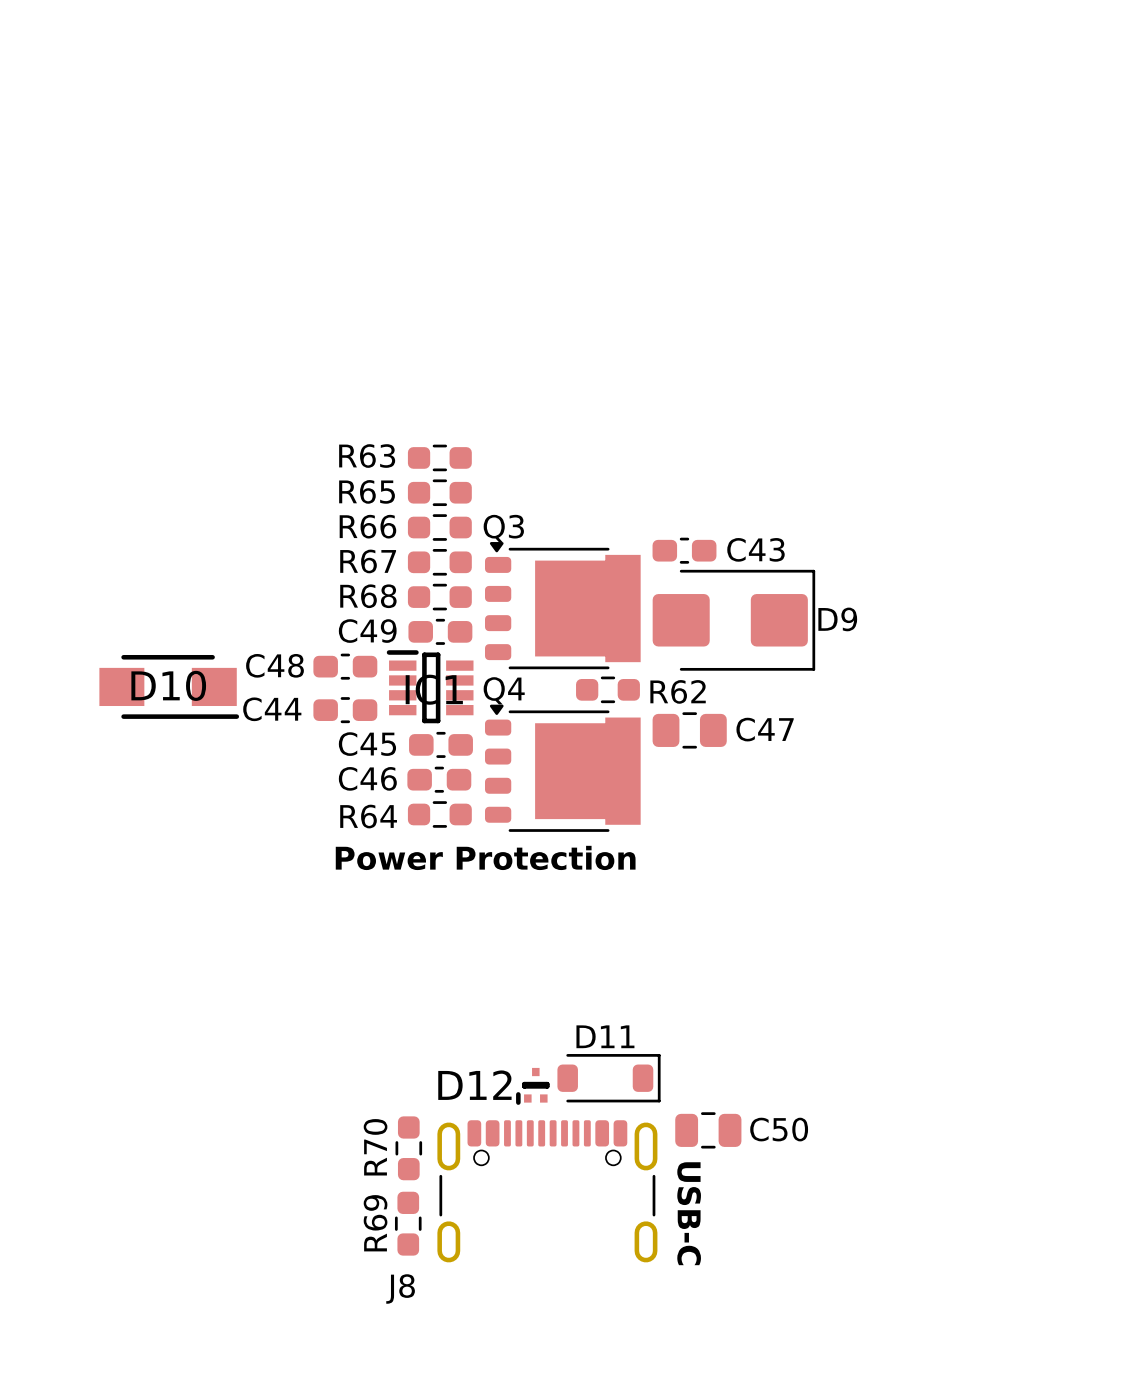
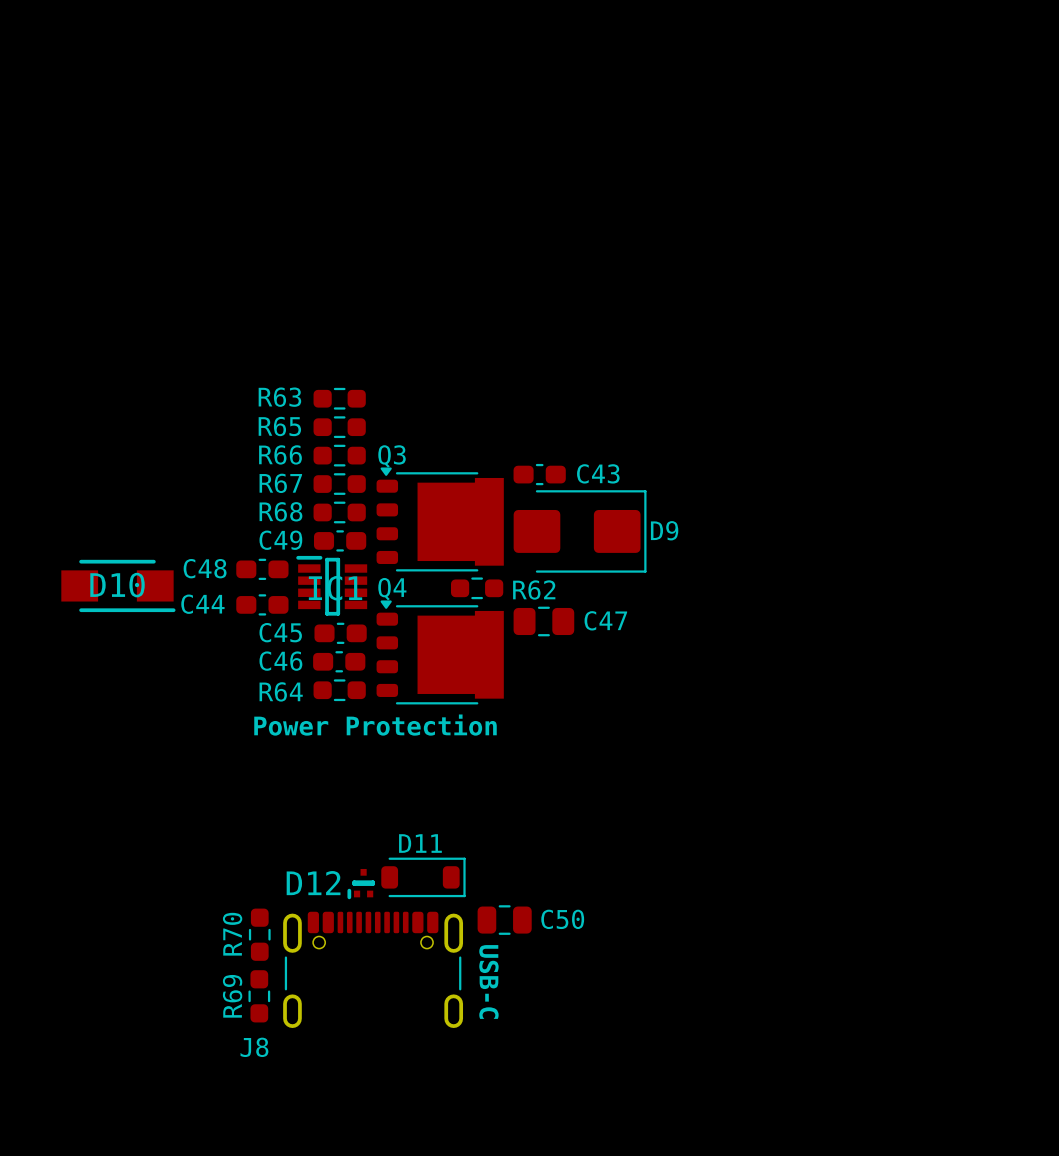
D11 position: (609, 1078) -> (423, 877)
D12 position: (532, 1086) -> (361, 884)
C50 position: (708, 1130) -> (504, 920)
R70 position: (408, 1148) -> (259, 934)
J8 position: (547, 1191) -> (373, 969)
text position: USB-C (689, 1213) -> USB-C (488, 981)
R69 position: (408, 1223) -> (259, 996)

